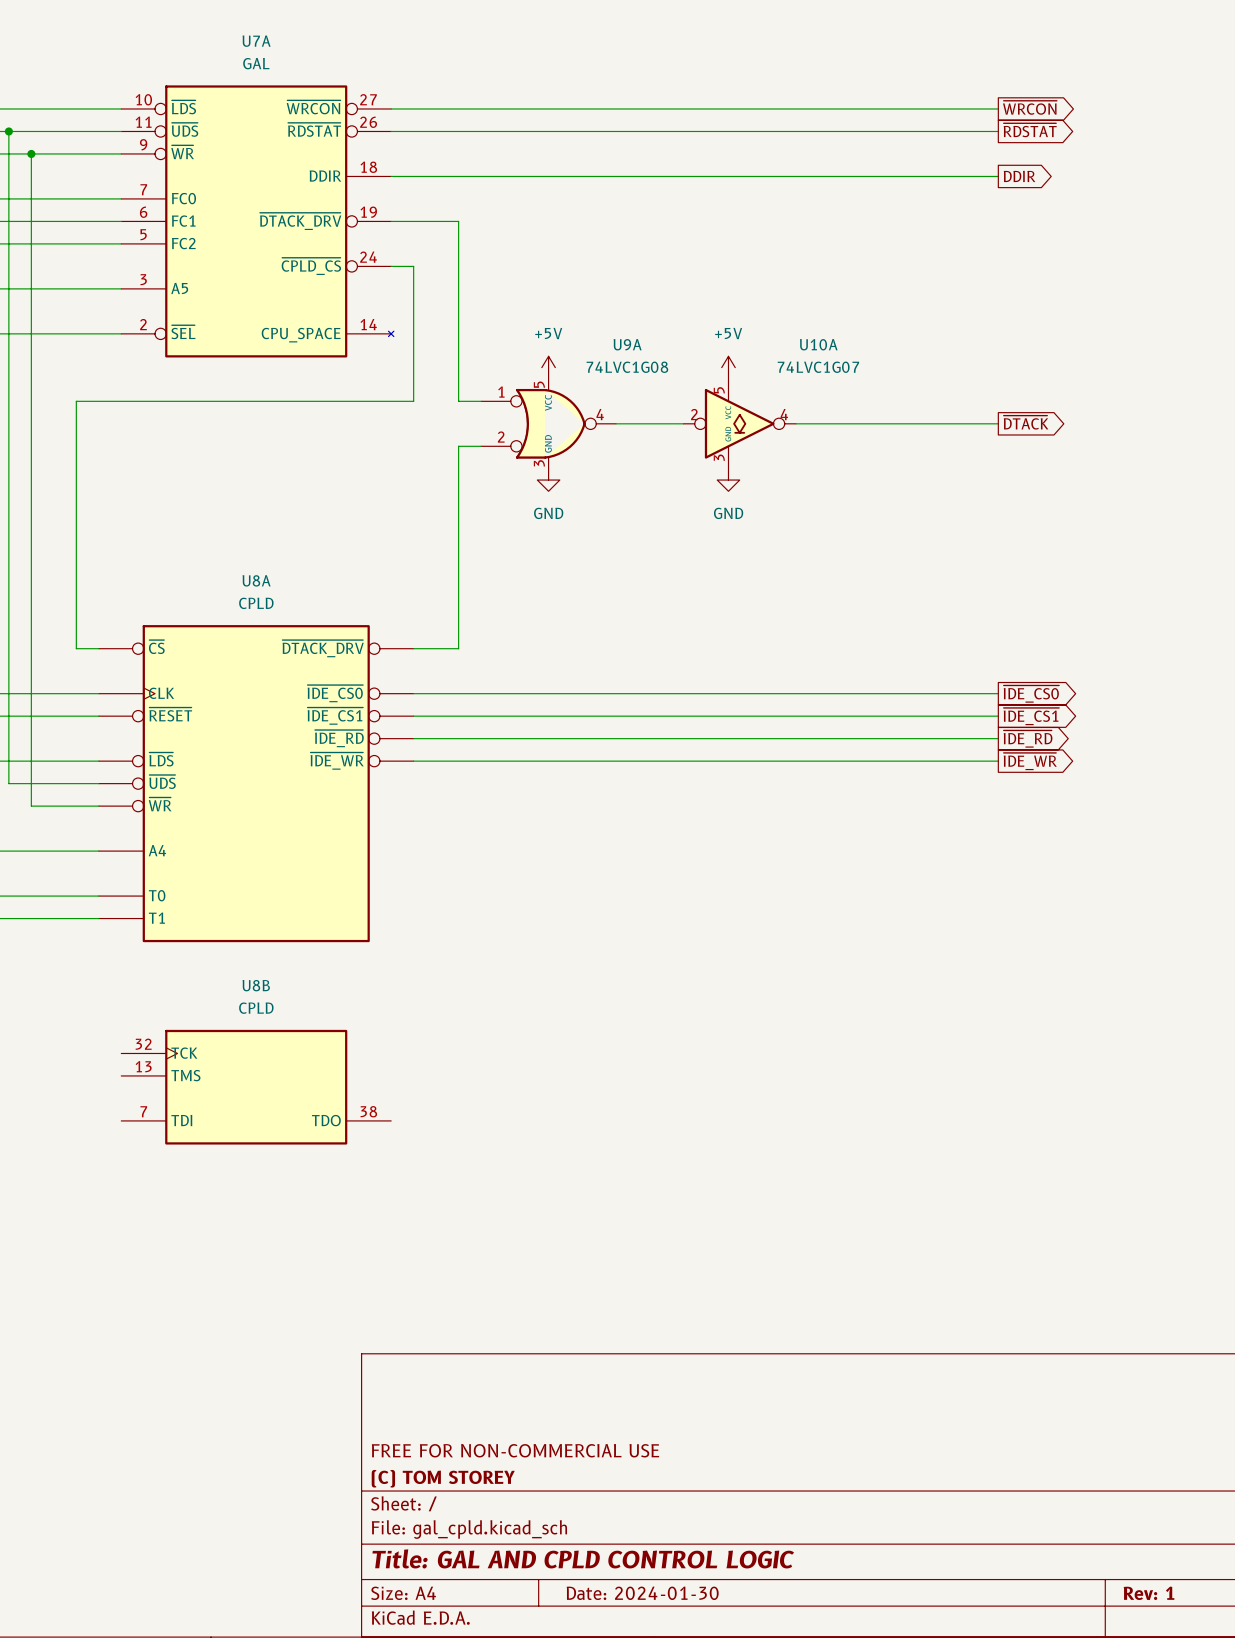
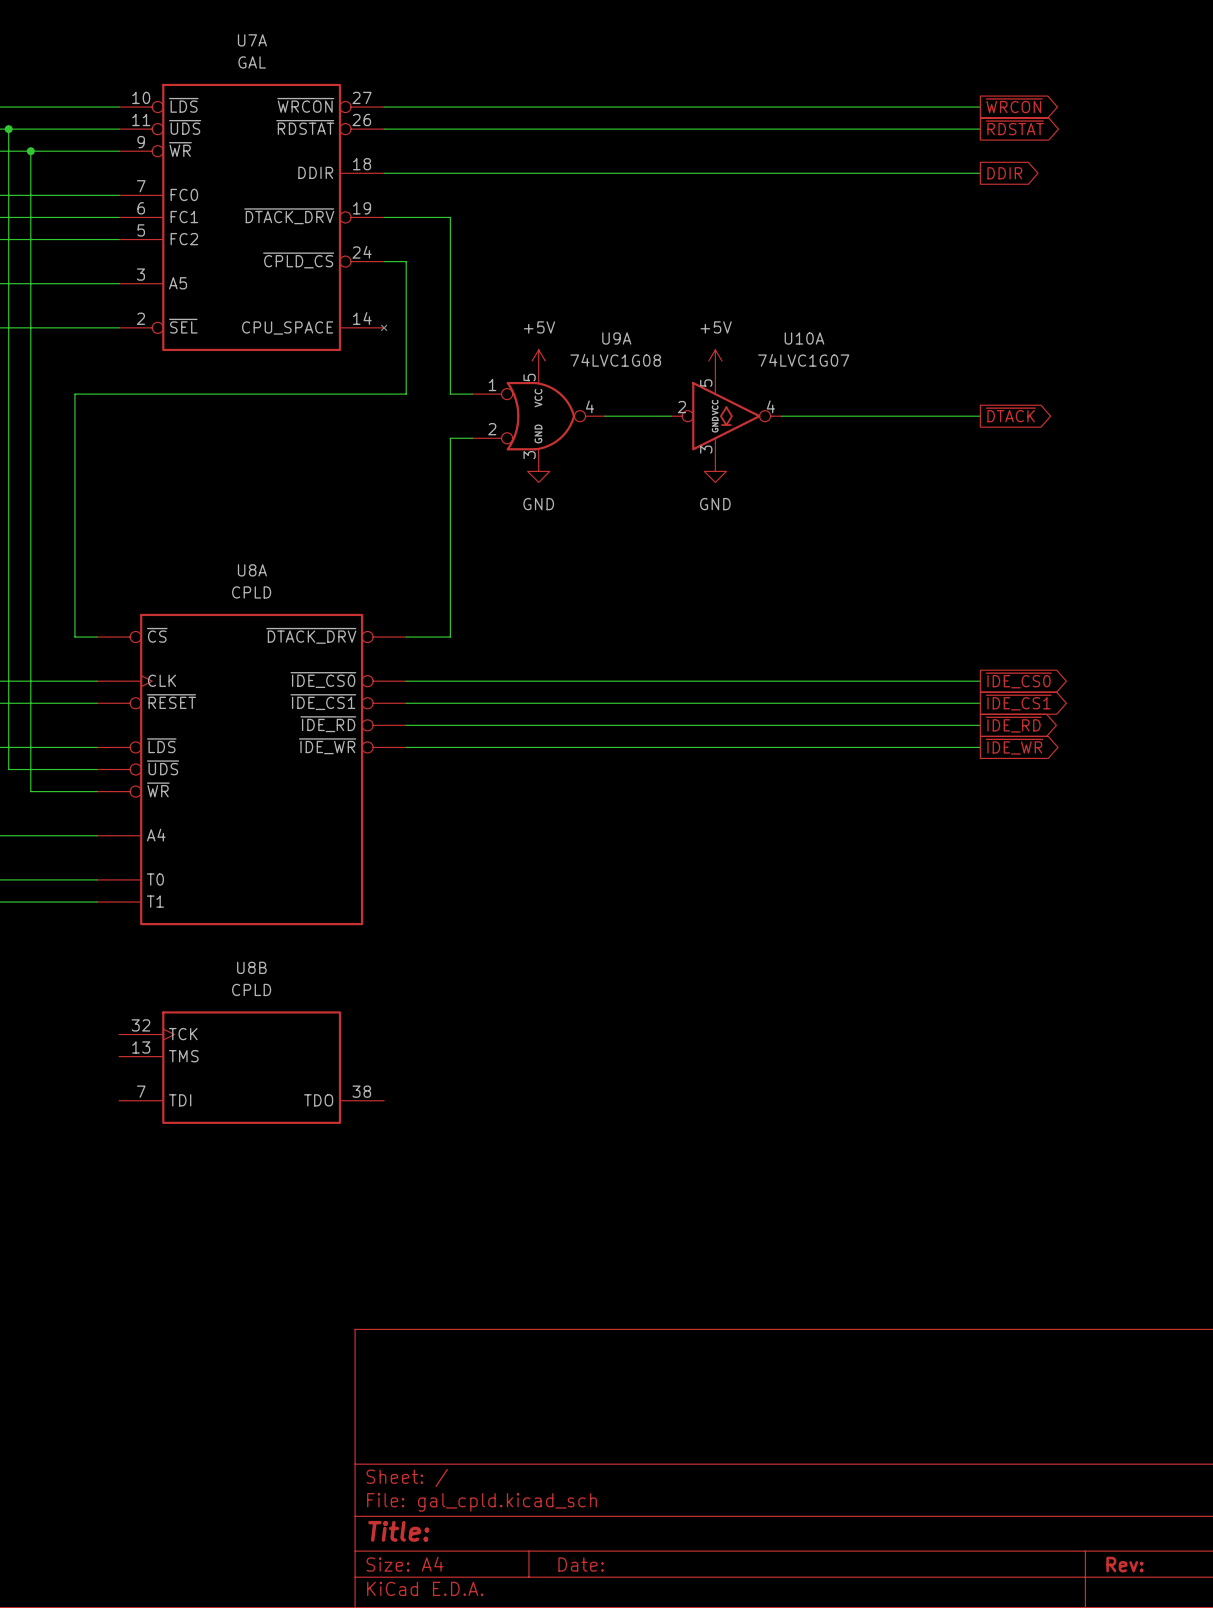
title block: FREE FOR NON-COMMERCIAL USE (515, 1450) -> none
title block: (C) TOM STOREY (443, 1478) -> none
title block: Title: GAL AND CPLD CONTROL LOGIC (583, 1558) -> Title: (398, 1531)
title block: Date: 2024-01-30 (642, 1593) -> Date: (581, 1564)
title block: Rev: 1 (1149, 1593) -> Rev: (1124, 1564)

